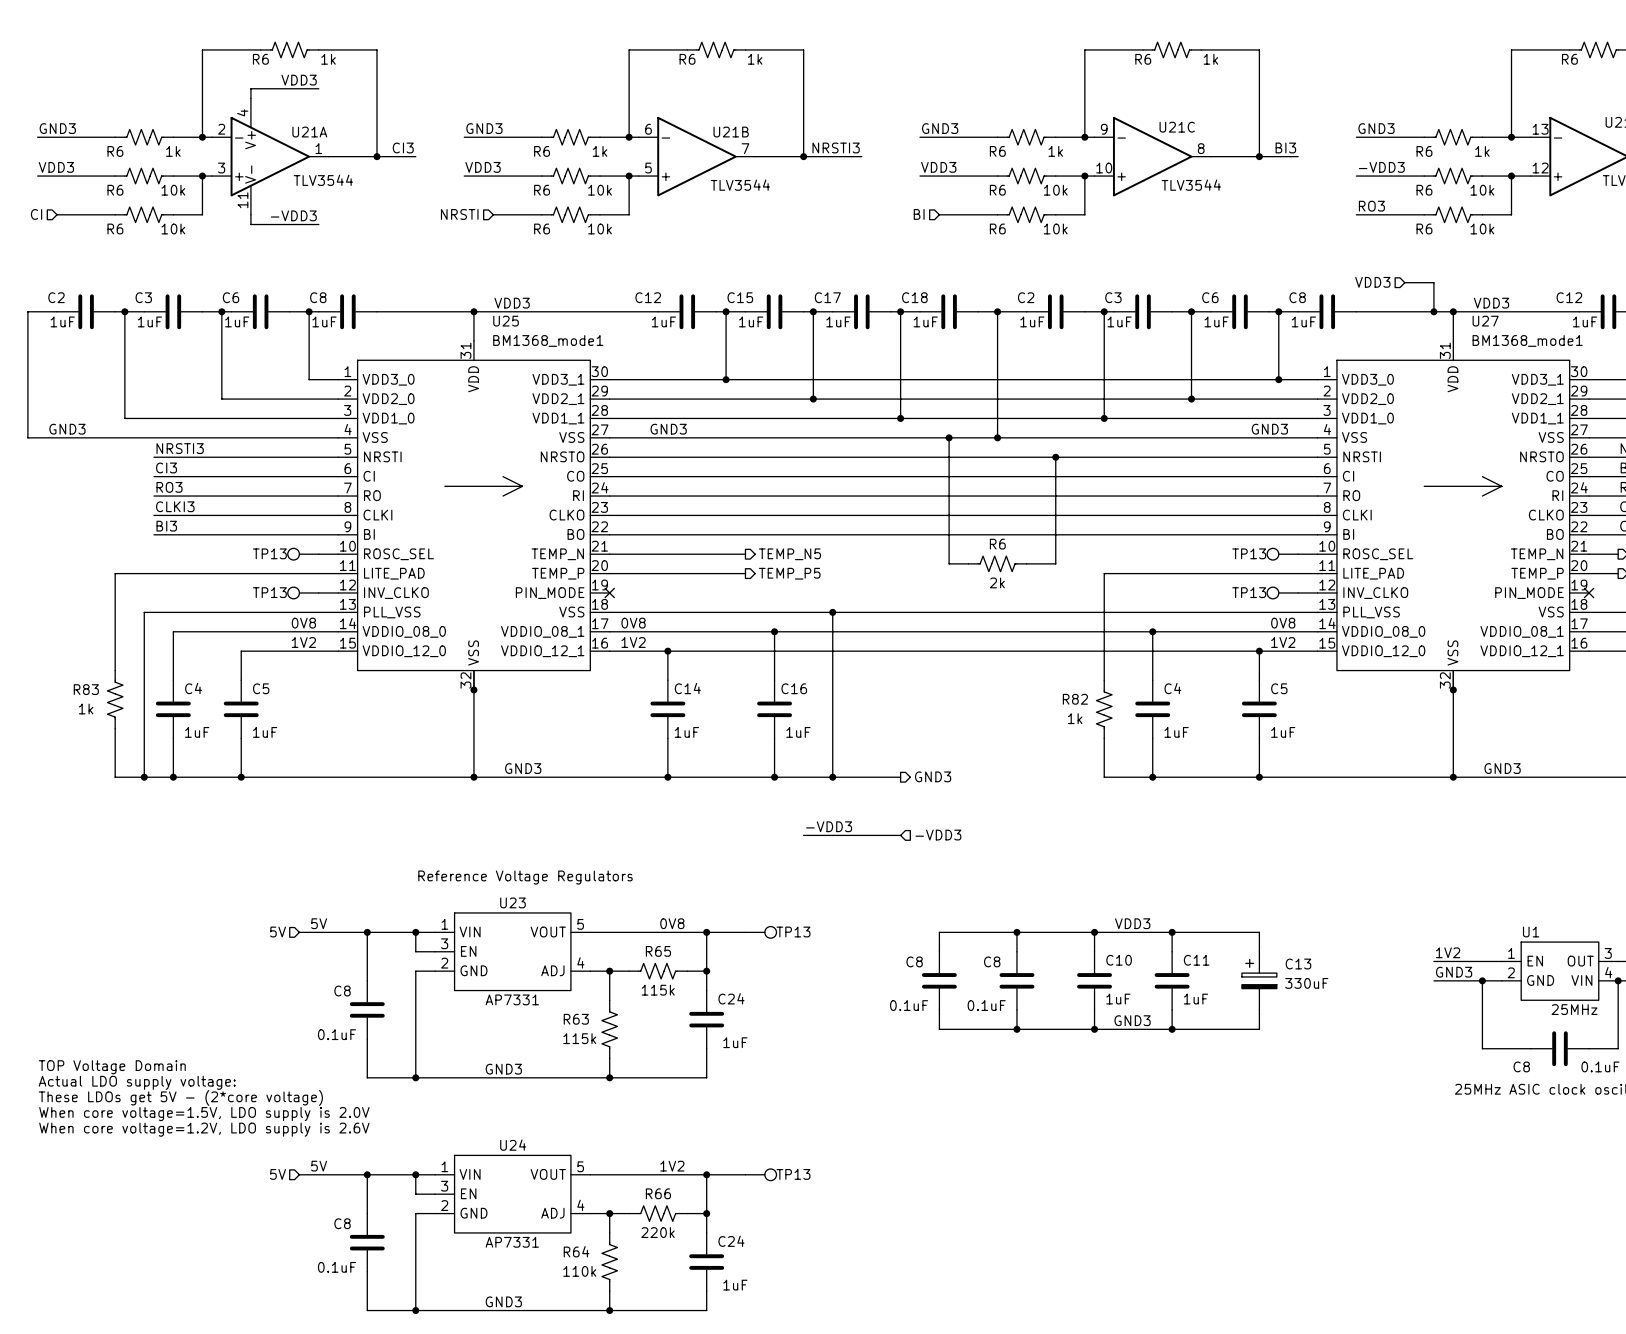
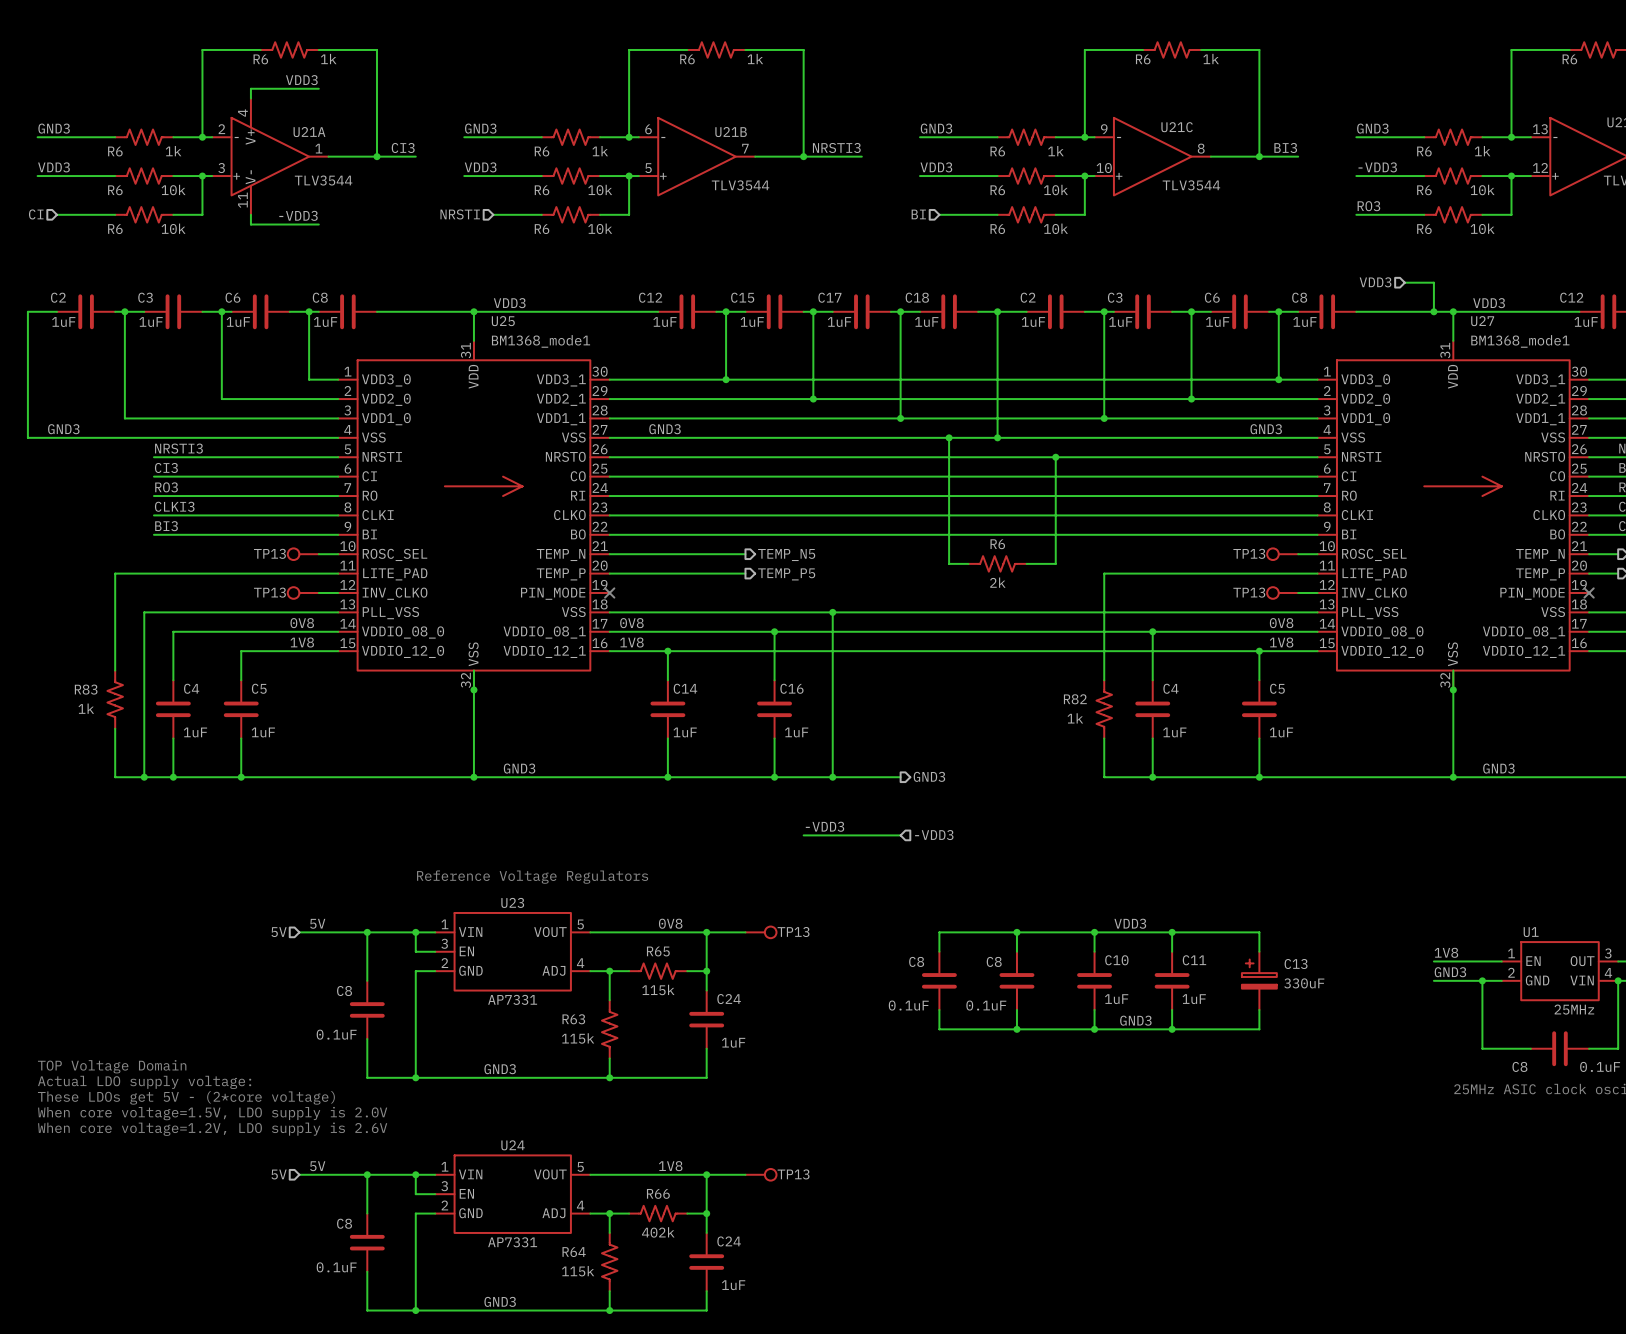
label: 1V2 (303, 642) -> 1V8 (302, 642)
label: 1V2 (633, 642) -> 1V8 (631, 642)
label: 1V2 (1283, 642) -> 1V8 (1281, 642)
label: 1V2 (1448, 952) -> 1V8 (1446, 952)
label: 1V2 (672, 1166) -> 1V8 (670, 1166)
R66 value: 220k (657, 1232) -> 402k (658, 1232)
R64 value: 110k (579, 1271) -> 115k (578, 1271)

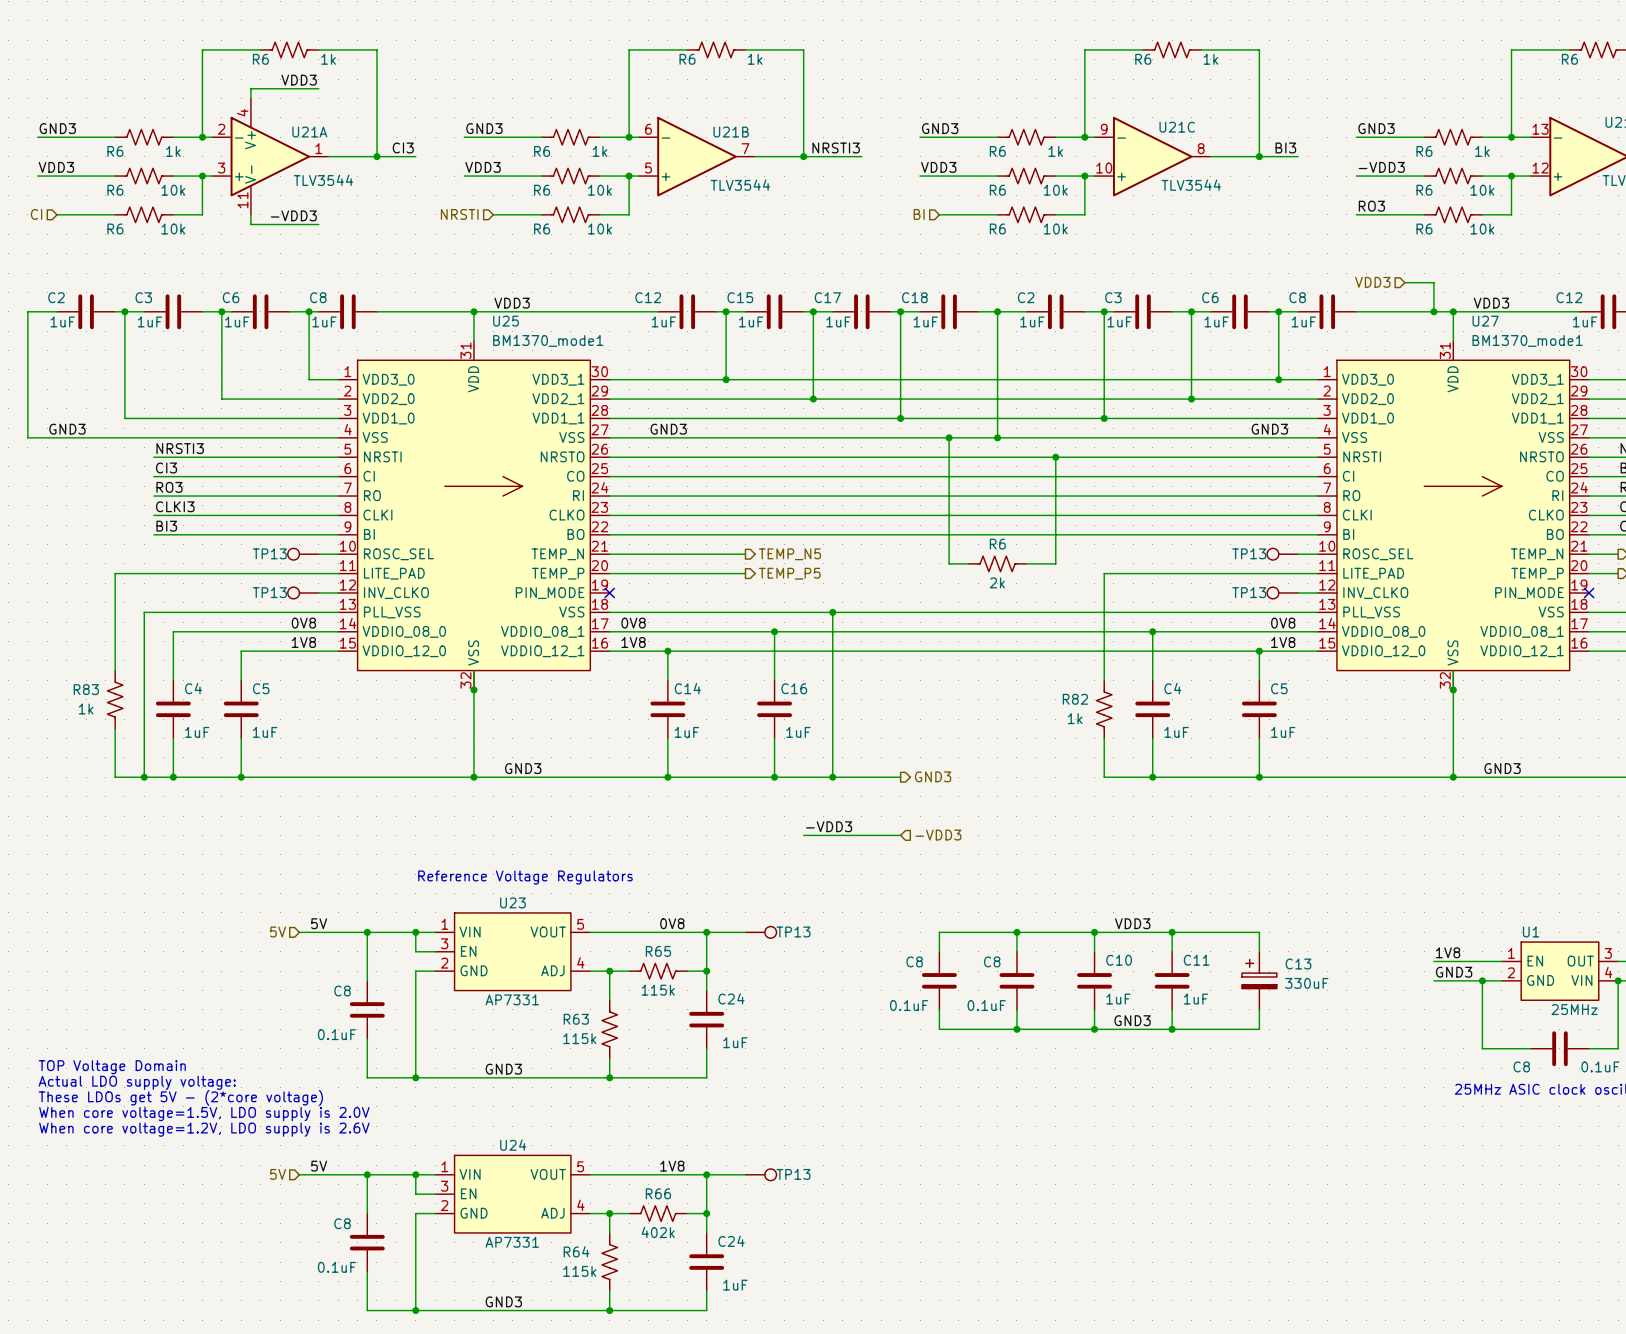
U25 value: BM1368_mode1 (541, 341) -> BM1370_mode1 (548, 340)
U27 value: BM1368_mode1 (1520, 341) -> BM1370_mode1 (1527, 340)

